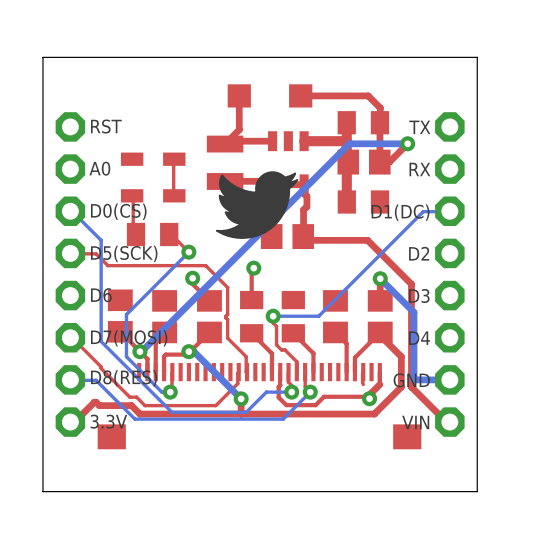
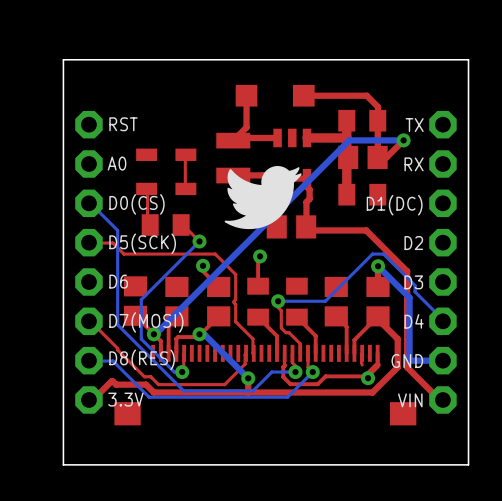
bottom track: (448, 211) (423, 211) (318, 316) -> (442, 321) (415, 291) (415, 285) (383, 254) (372, 254) (325, 301) (320, 301)

